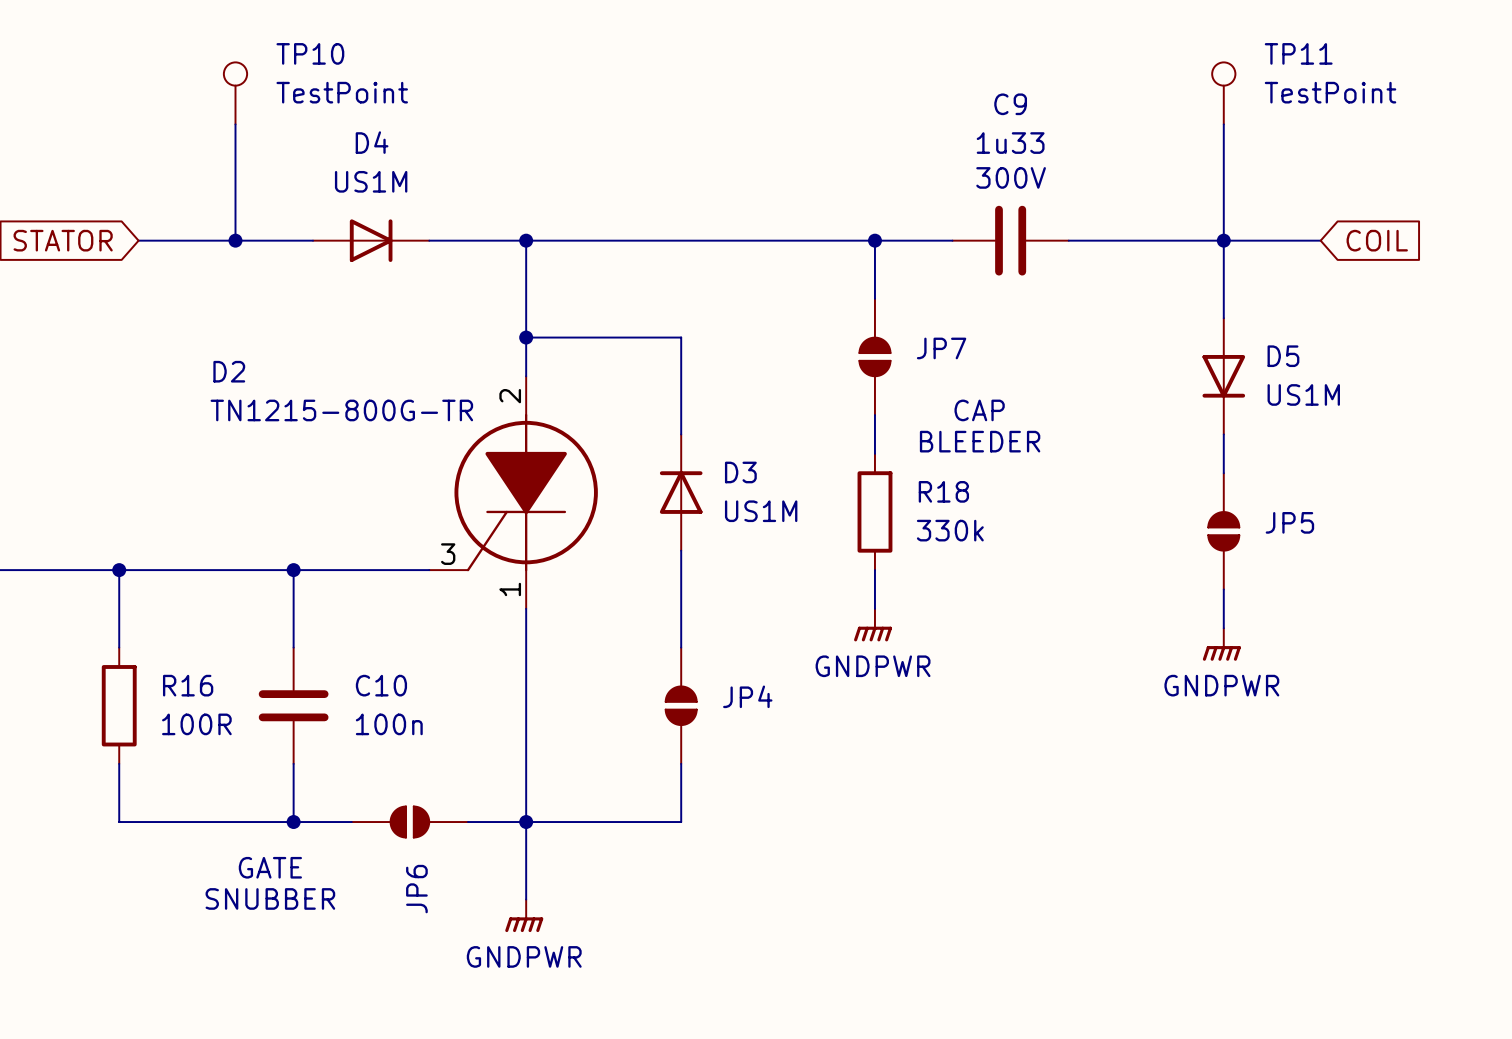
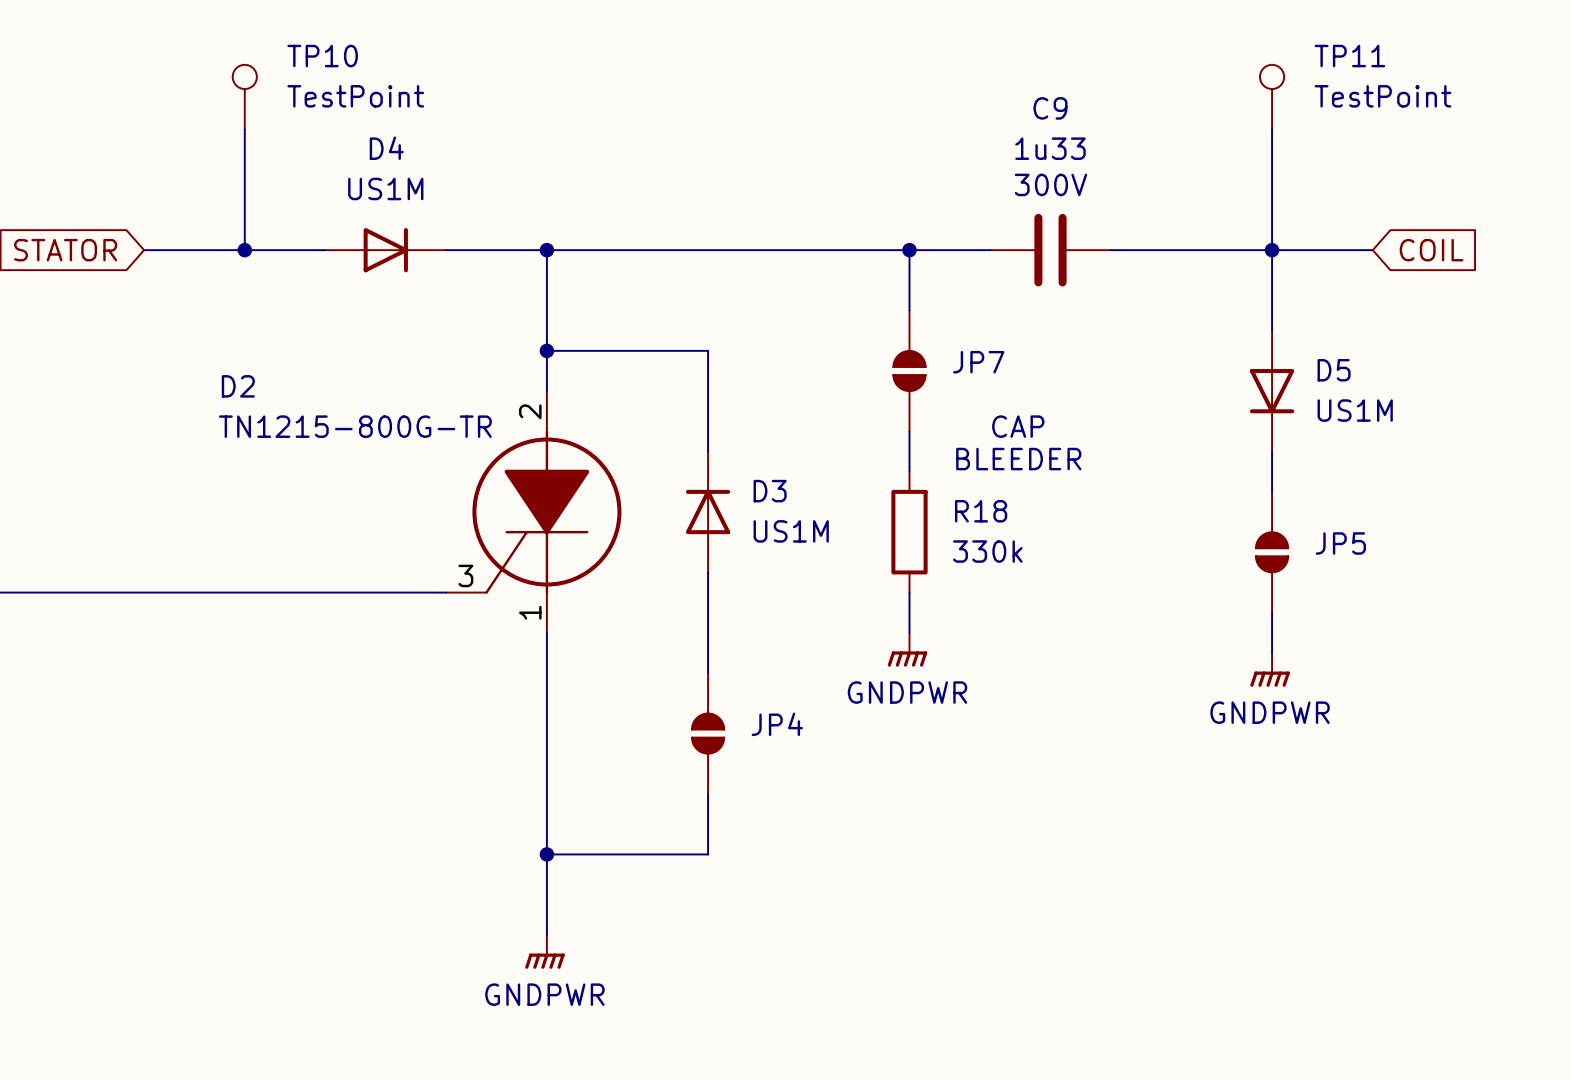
wire: (119, 570) (119, 647) -> none
junction: (119, 570) -> none
wire: (293, 570) (293, 647) -> none
junction: (293, 570) -> none
R16: 100R (119, 705) -> none
C10: 100n (293, 705) -> none
wire: (119, 763) (119, 822) (351, 822) -> none
wire: (293, 763) (293, 822) -> none
junction: (293, 822) -> none
JP6: (409, 822) -> none
wire: (468, 822) (526, 822) -> none
text: GATE (270, 867) -> none
text: SNUBBER (270, 898) -> none

